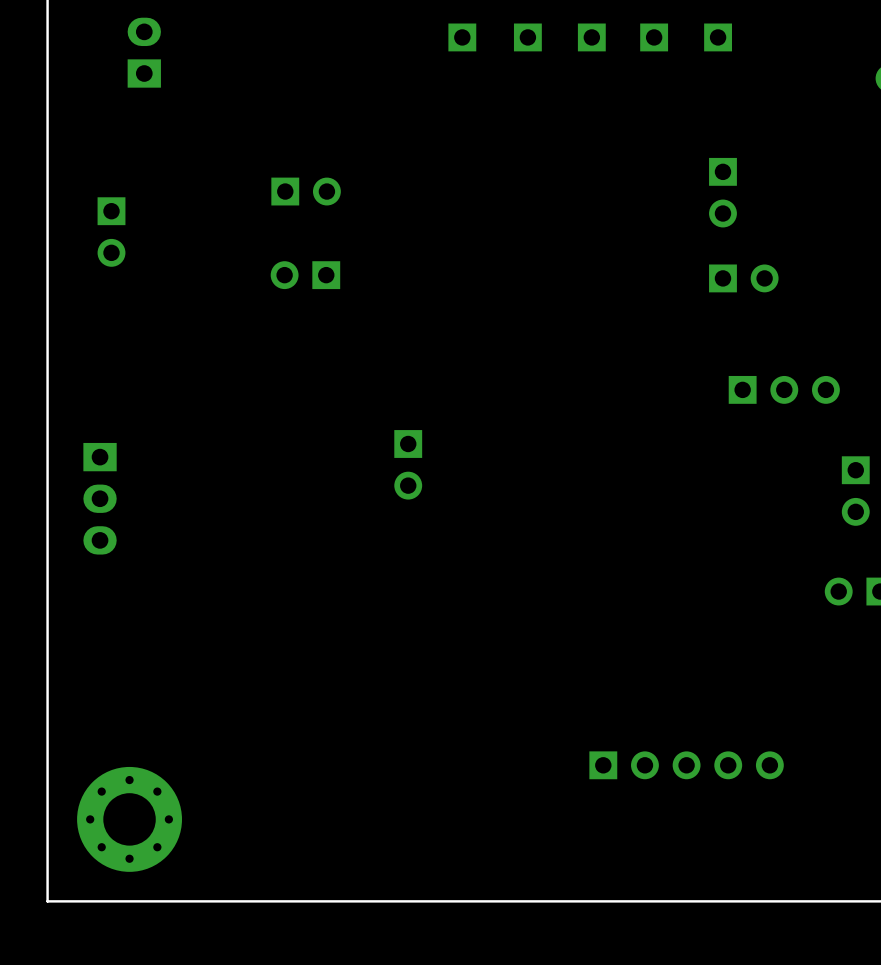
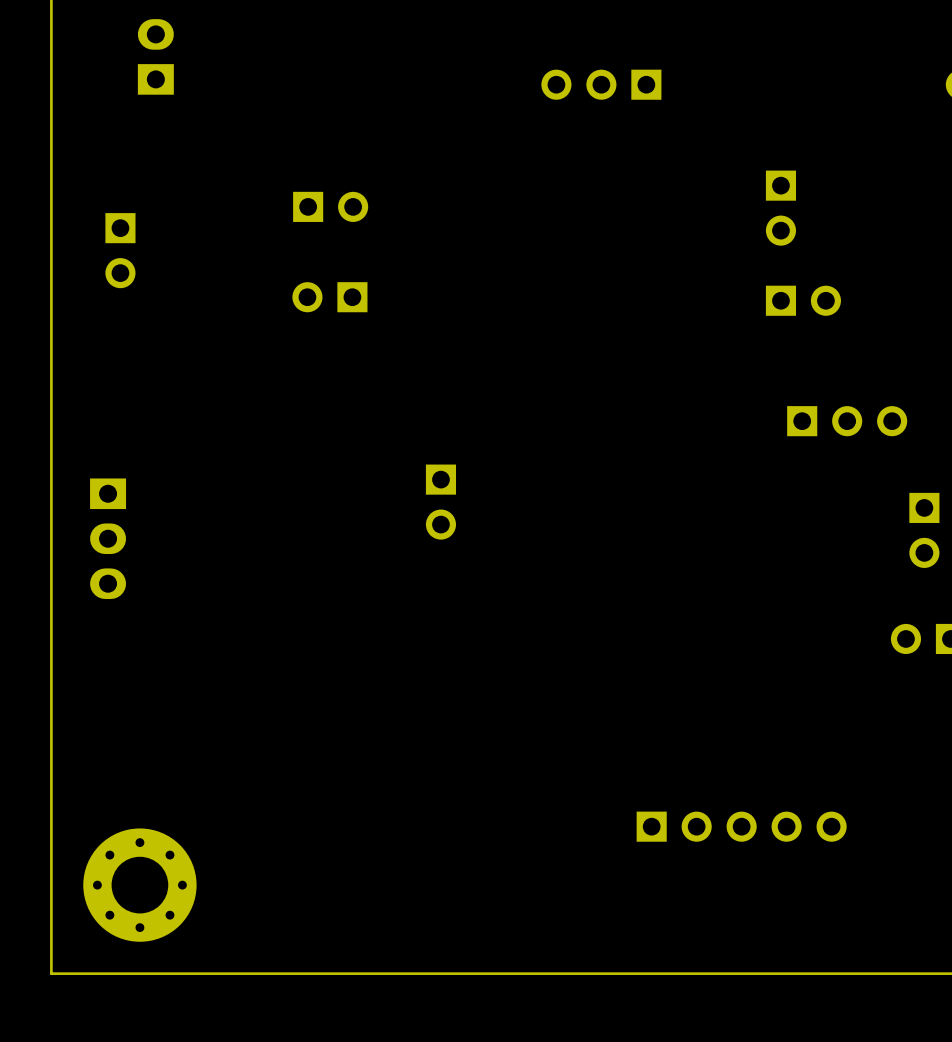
part: (462, 37) -> none
part: (527, 37) -> none
part: (591, 37) -> none
part: (654, 37) -> none
part: (718, 37) -> none
part: none -> (601, 84)

